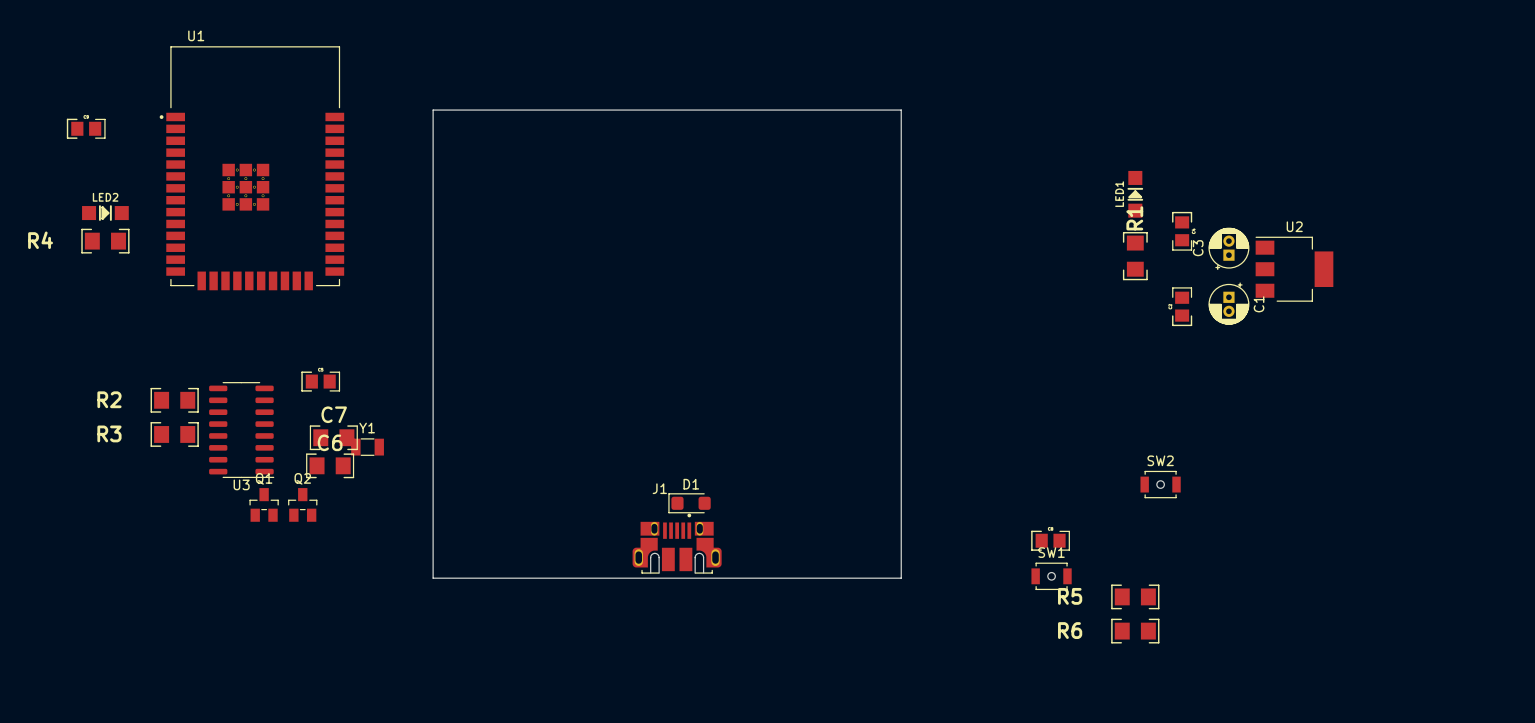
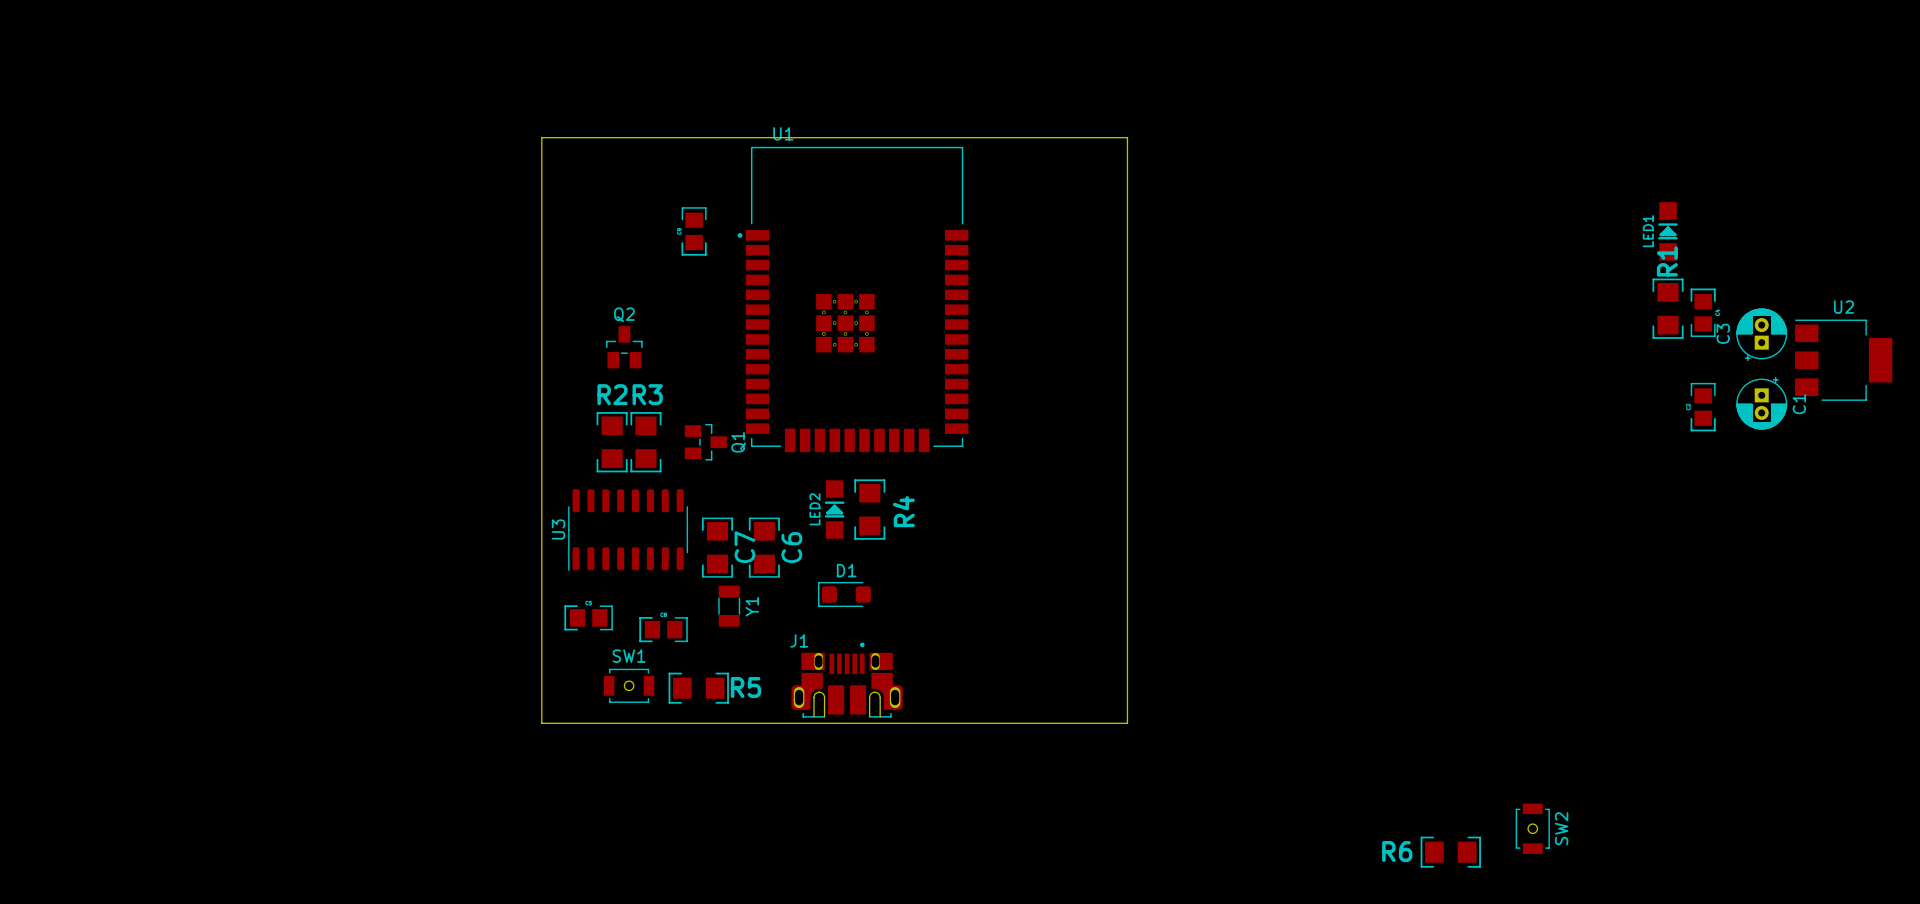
part rotation: 0° (86, 128) -> 90° counterclockwise (694, 231)
part position: (86, 128) -> (694, 231)
U1 position: (251, 168) -> (853, 299)
LED1 position: (1135, 194) -> (1668, 231)
LED2 rotation: 0° (105, 213) -> 90° counterclockwise (834, 509)
LED2 position: (105, 213) -> (834, 509)
part position: (1182, 231) -> (1703, 312)
R4 name position: R4 (40, 240) -> R4 (903, 511)
R4 rotation: 0° (105, 241) -> 90° clockwise (869, 509)
R4 position: (105, 241) -> (869, 509)
C3 position: (1228, 248) -> (1761, 334)
R1 position: (1135, 256) -> (1668, 308)
U2 position: (1294, 269) -> (1843, 360)
C1 position: (1228, 303) -> (1761, 403)
part position: (1182, 306) -> (1703, 407)
part position: (320, 381) -> (588, 617)
R2 name position: R2 (109, 399) -> R2 (612, 394)
R2 rotation: 0° (174, 400) -> 90° clockwise (612, 442)
R2 position: (174, 400) -> (612, 442)
U3 rotation: 0° (241, 430) -> 90° clockwise (628, 530)
U3 position: (241, 430) -> (628, 530)
R3 name position: R3 (109, 433) -> R3 (647, 394)
R3 rotation: 0° (174, 434) -> 90° clockwise (645, 442)
R3 position: (174, 434) -> (645, 442)
C7 rotation: 0° (333, 437) -> 90° clockwise (717, 547)
C7 position: (333, 437) -> (717, 547)
Y1 rotation: 0° (367, 447) -> 90° clockwise (729, 606)
Y1 position: (367, 447) -> (729, 606)
C6 rotation: 0° (330, 465) -> 90° clockwise (764, 547)
C6 position: (330, 465) -> (764, 547)
SW2 rotation: 0° (1160, 484) -> 90° clockwise (1532, 828)
SW2 position: (1160, 484) -> (1532, 828)
J1 name position: J1 (659, 488) -> J1 (799, 640)
D1 position: (689, 503) -> (844, 594)
Q1 rotation: 0° (264, 504) -> 90° clockwise (705, 442)
Q1 position: (264, 504) -> (705, 442)
Q2 position: (302, 504) -> (624, 347)
part position: (1050, 540) -> (663, 629)
SW1 position: (1051, 576) -> (629, 685)
R5 name position: R5 (1070, 596) -> R5 (746, 687)
R5 position: (1135, 596) -> (698, 688)
R6 name position: R6 (1070, 630) -> R6 (1397, 851)
R6 position: (1135, 631) -> (1450, 852)

